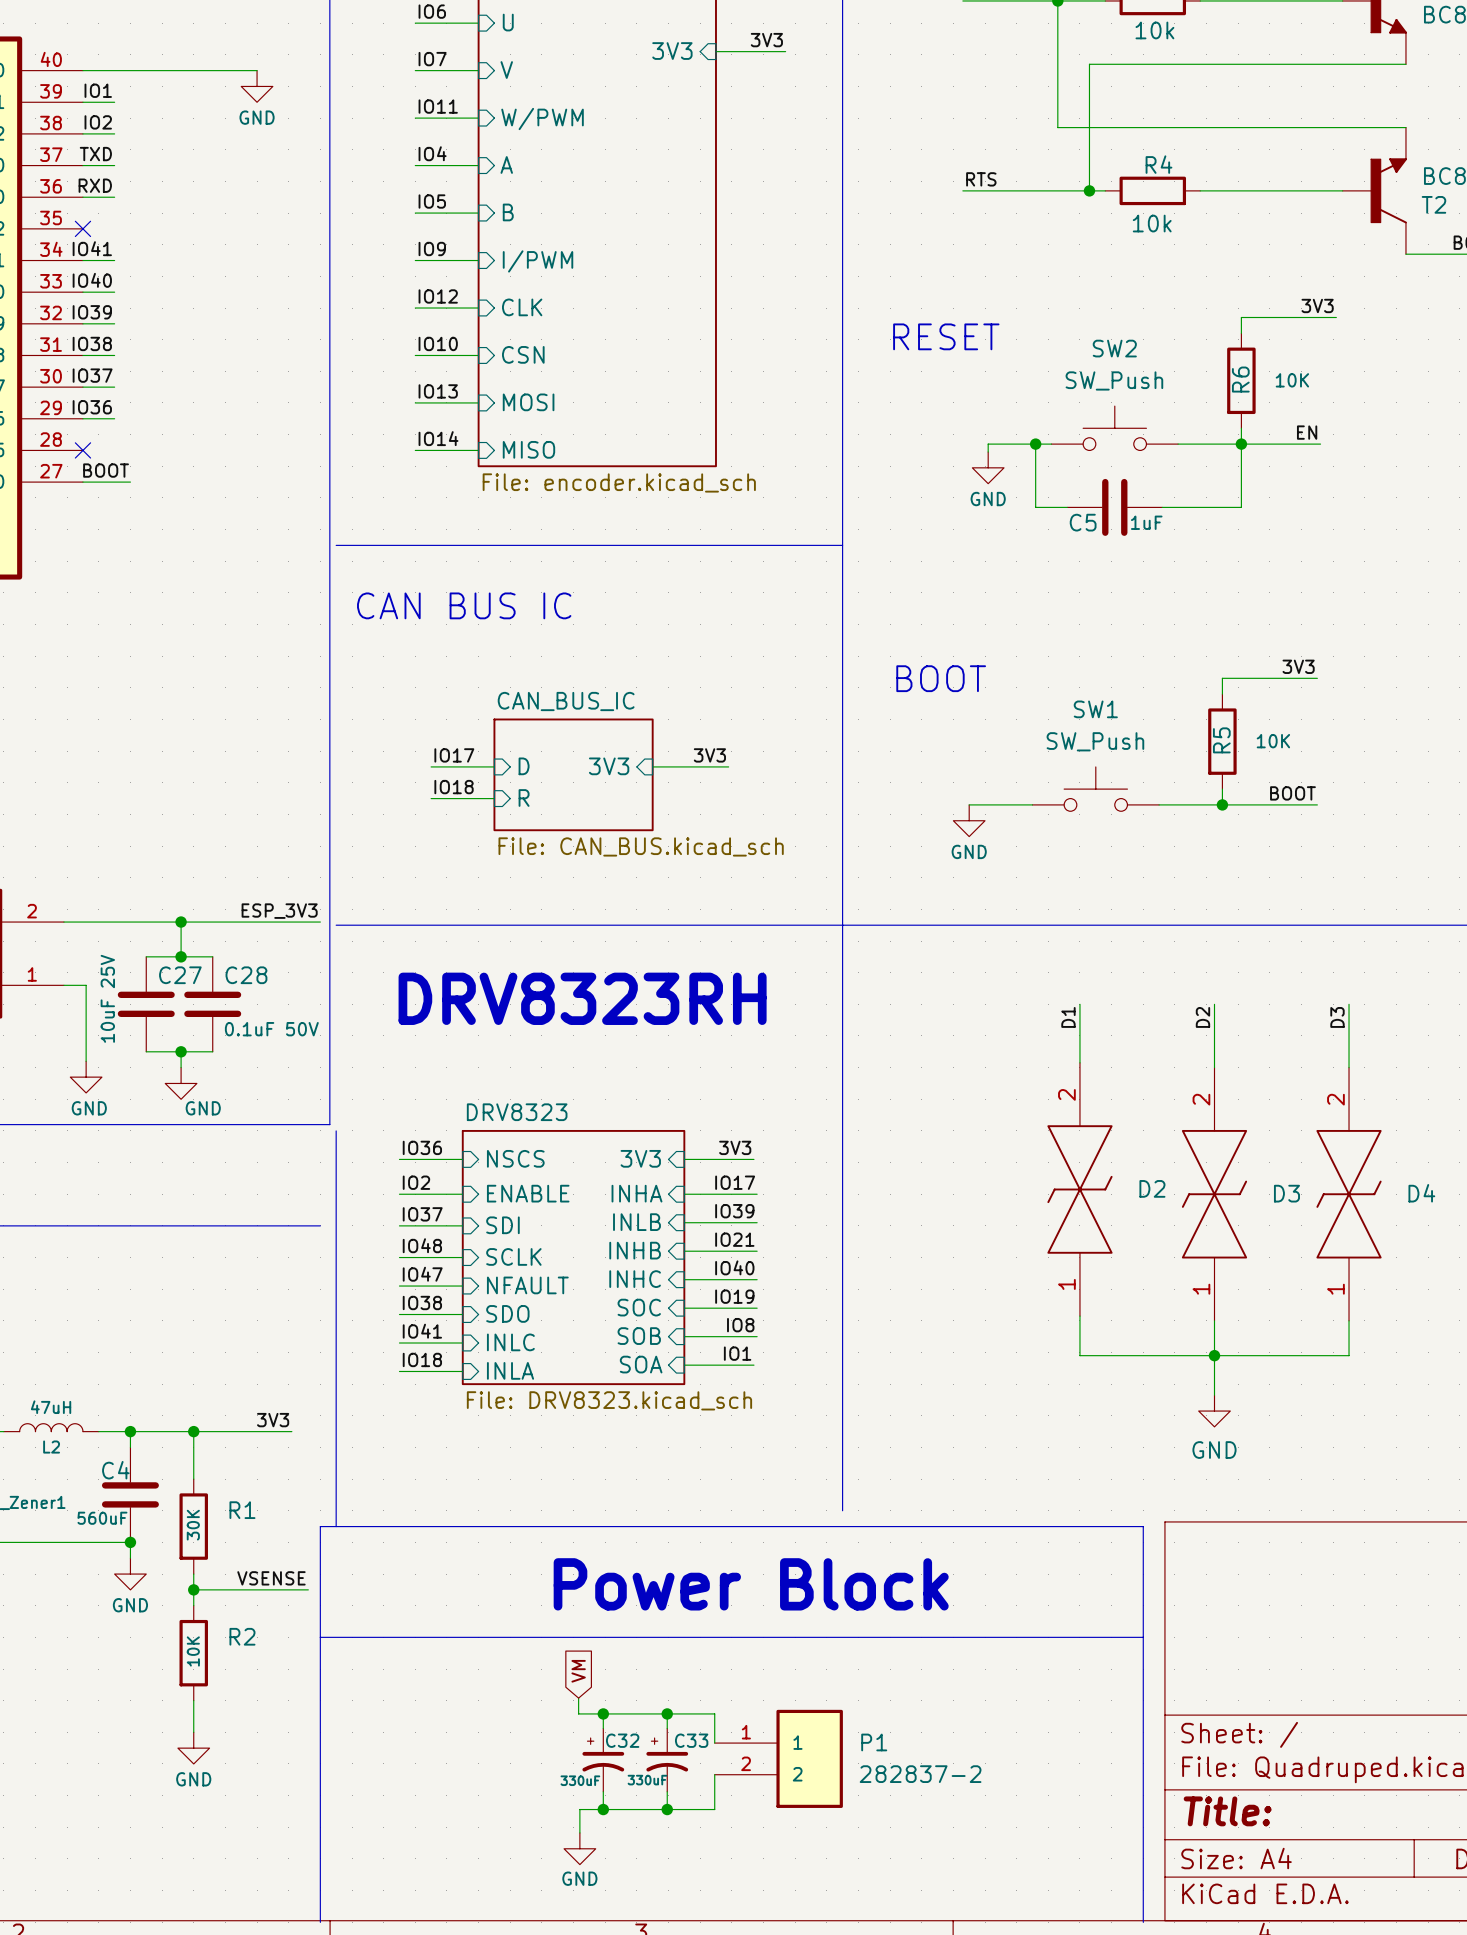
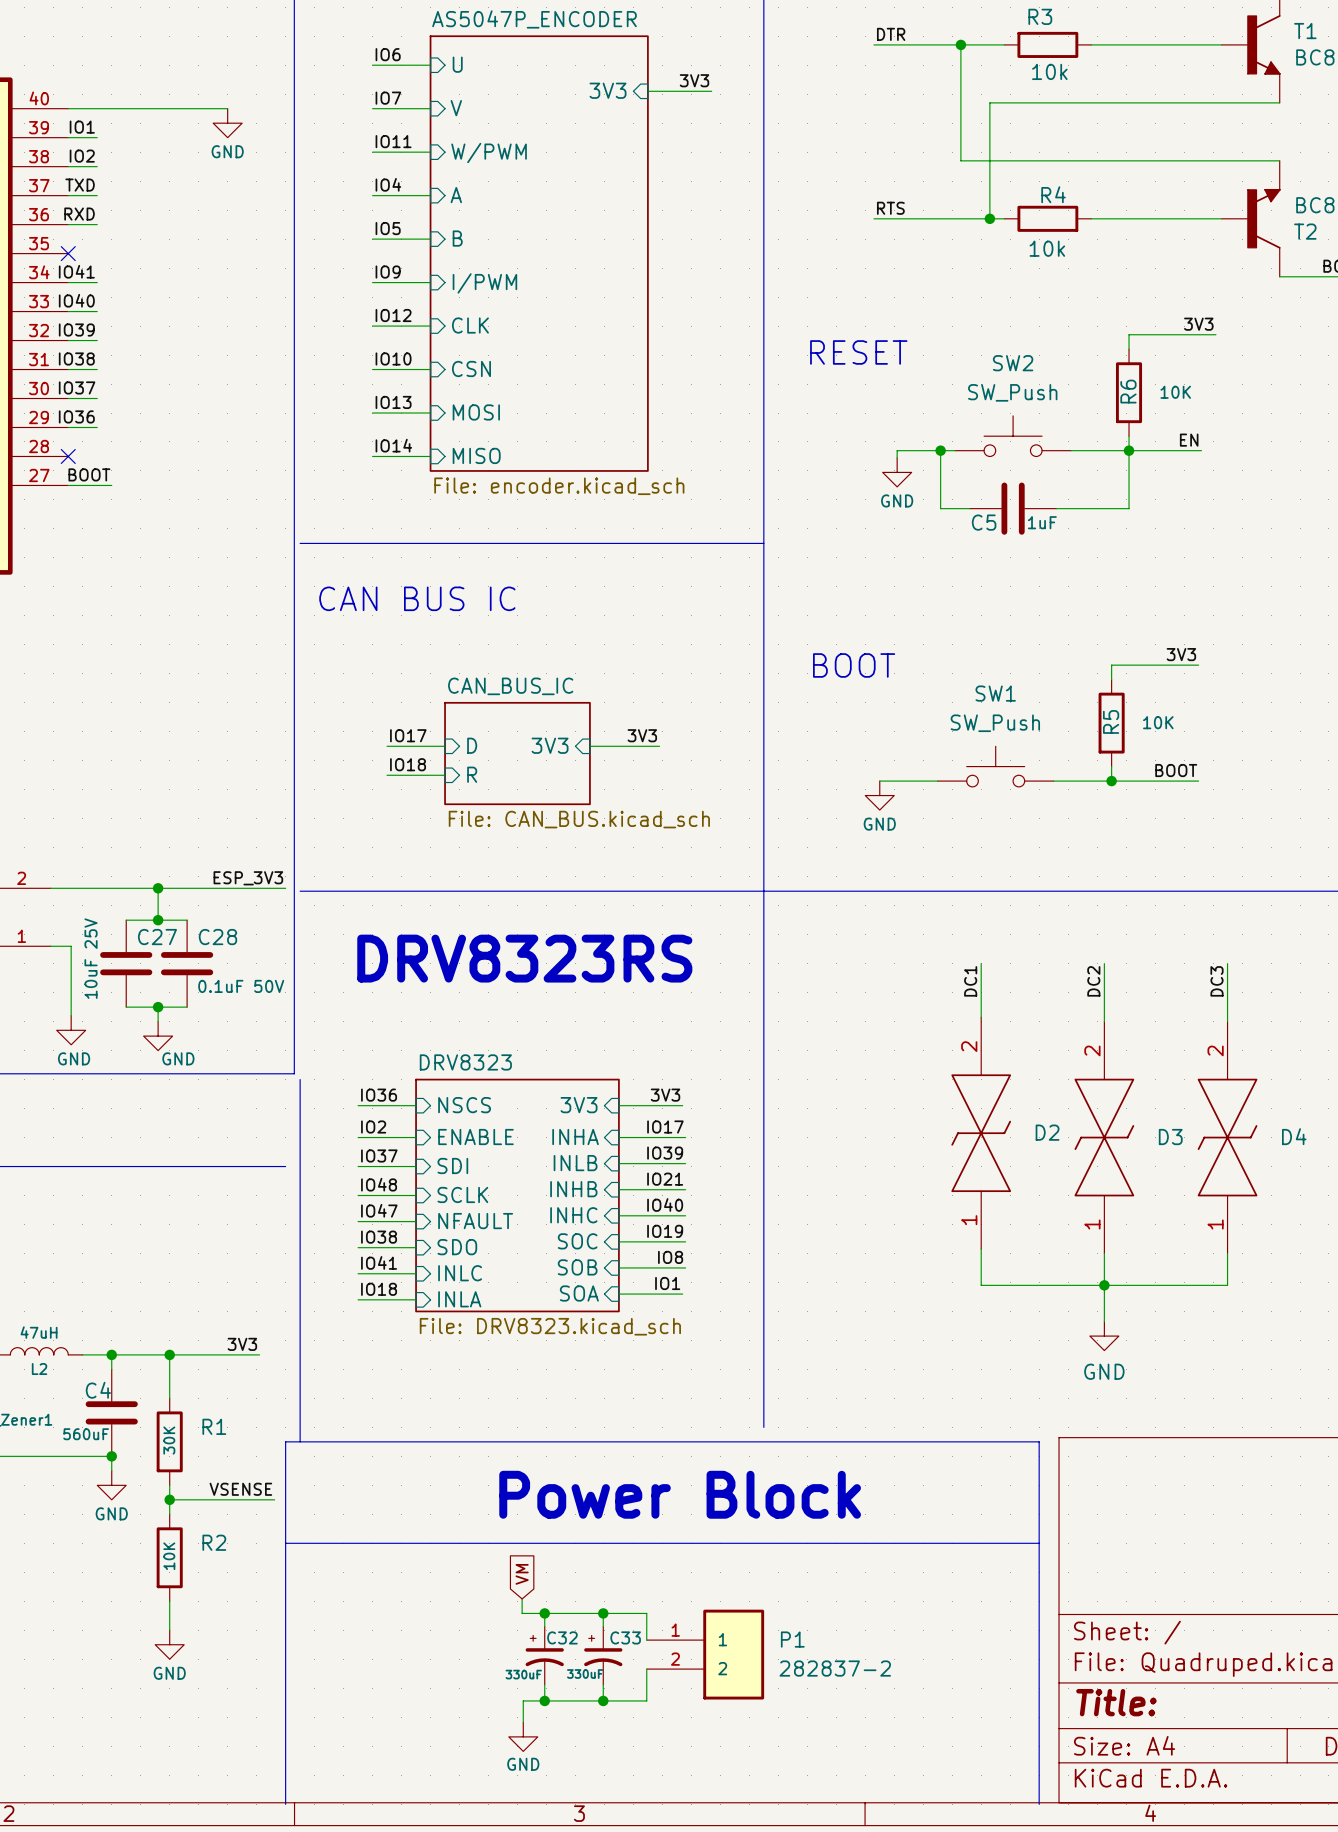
text: DRV8323RH (582, 998) -> DRV8323RS (524, 958)
label: D1 (1068, 1017) -> DC1 (970, 981)
label: D2 (1202, 1017) -> DC2 (1093, 981)
label: D3 (1337, 1017) -> DC3 (1217, 981)

